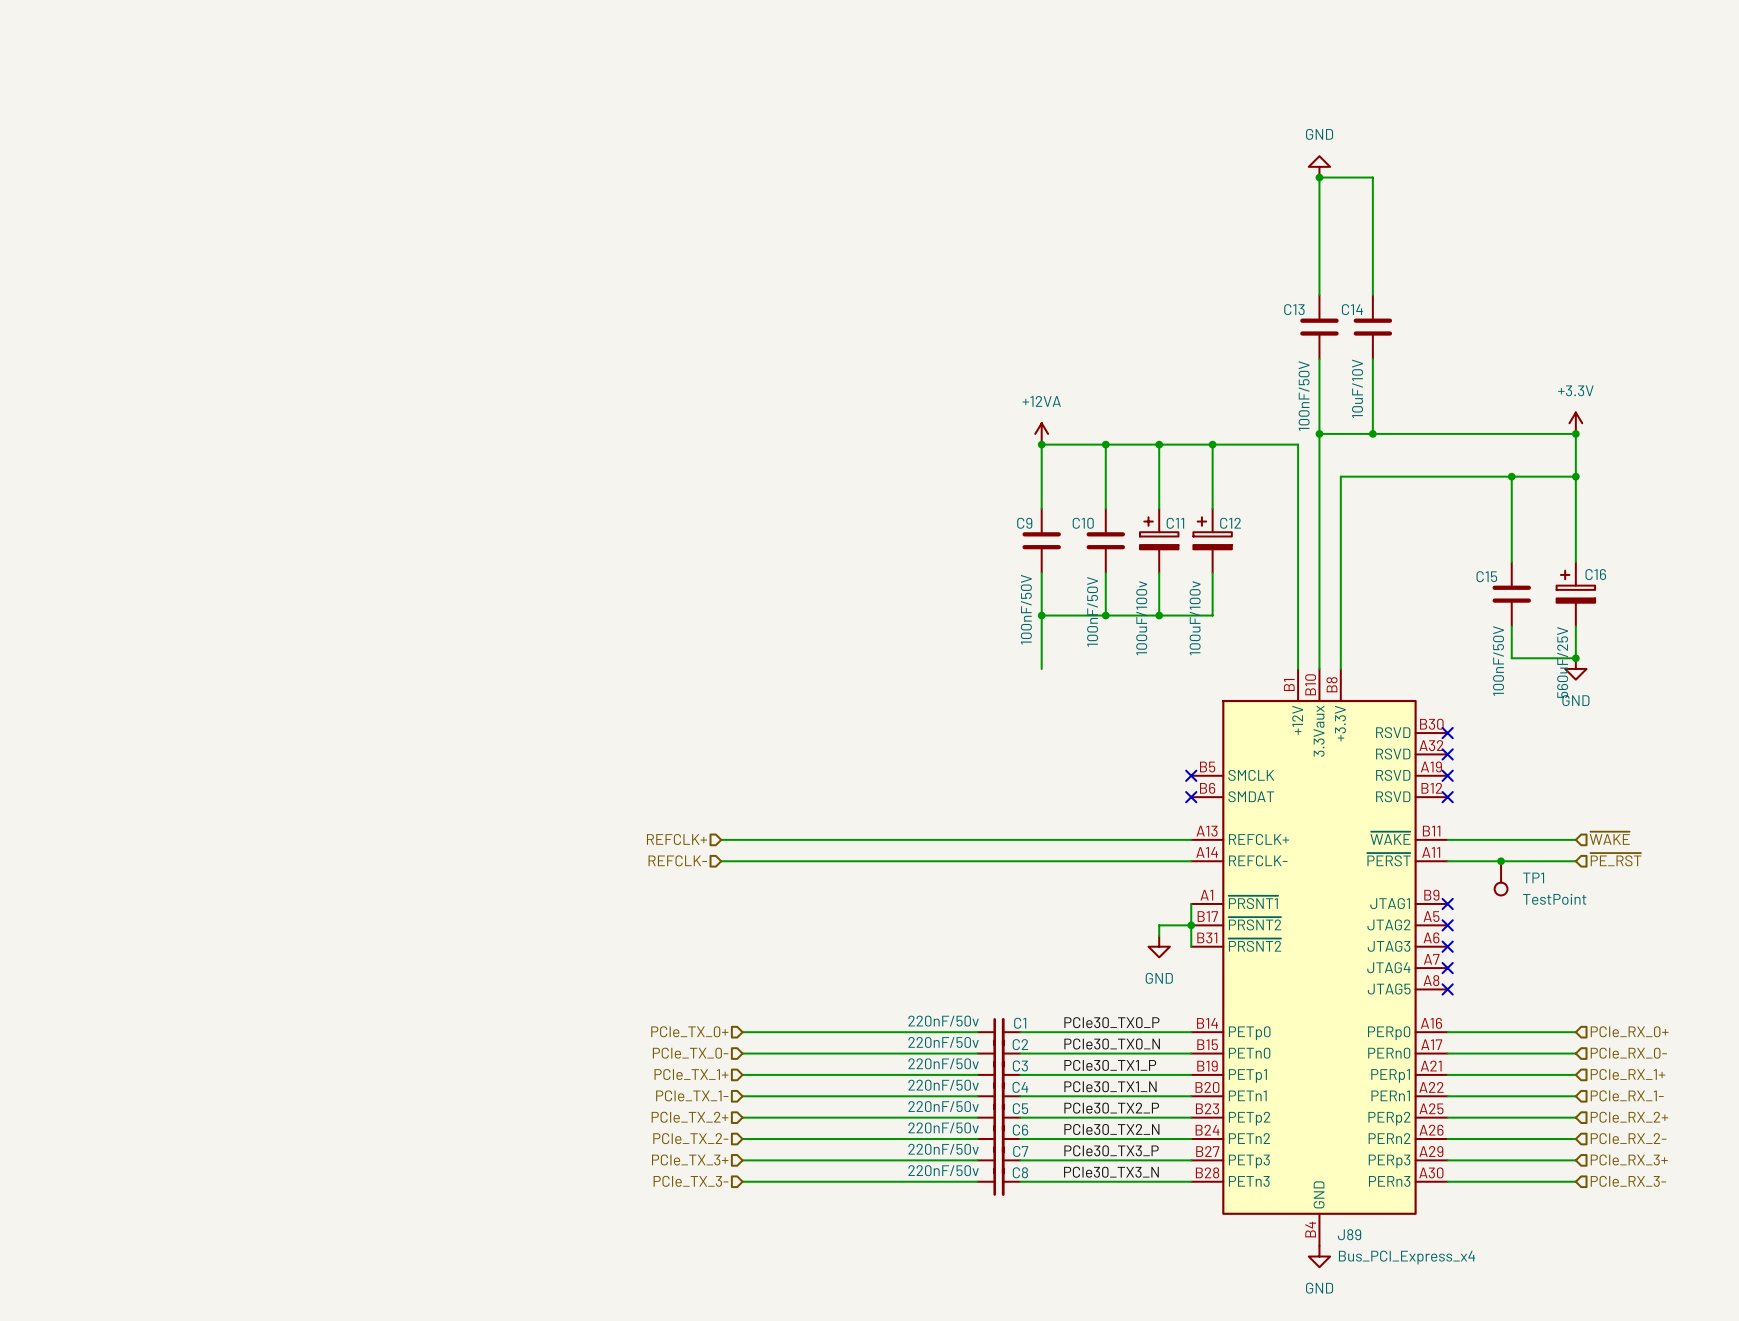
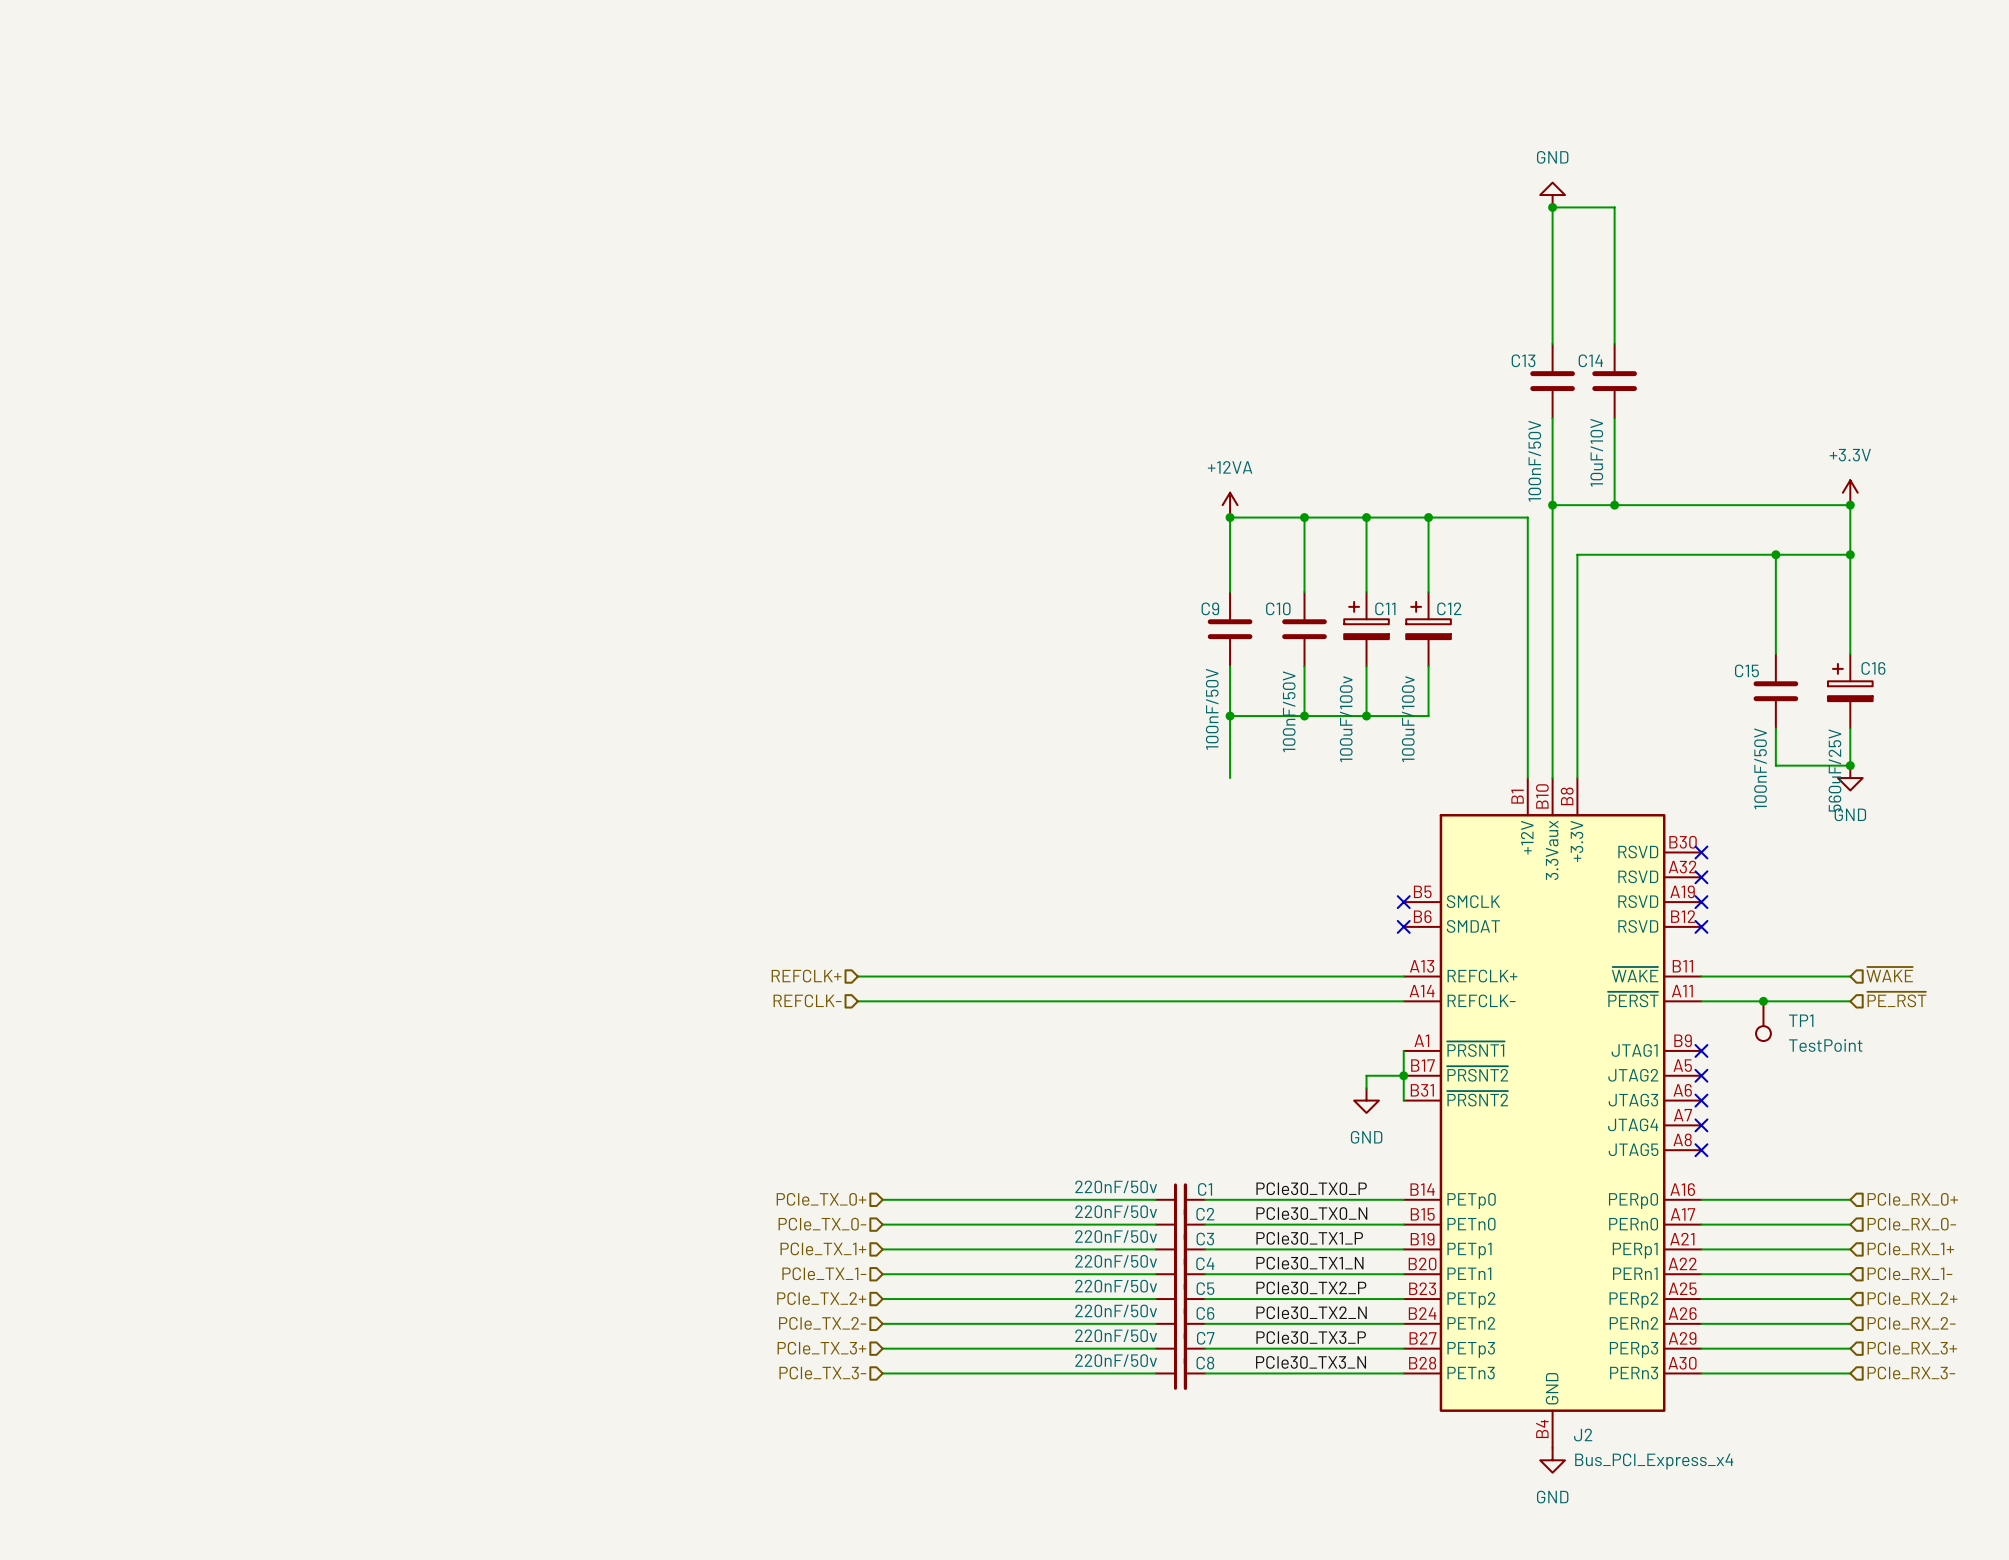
J89 name: J89 (1349, 1234) -> J2 (1583, 1435)

